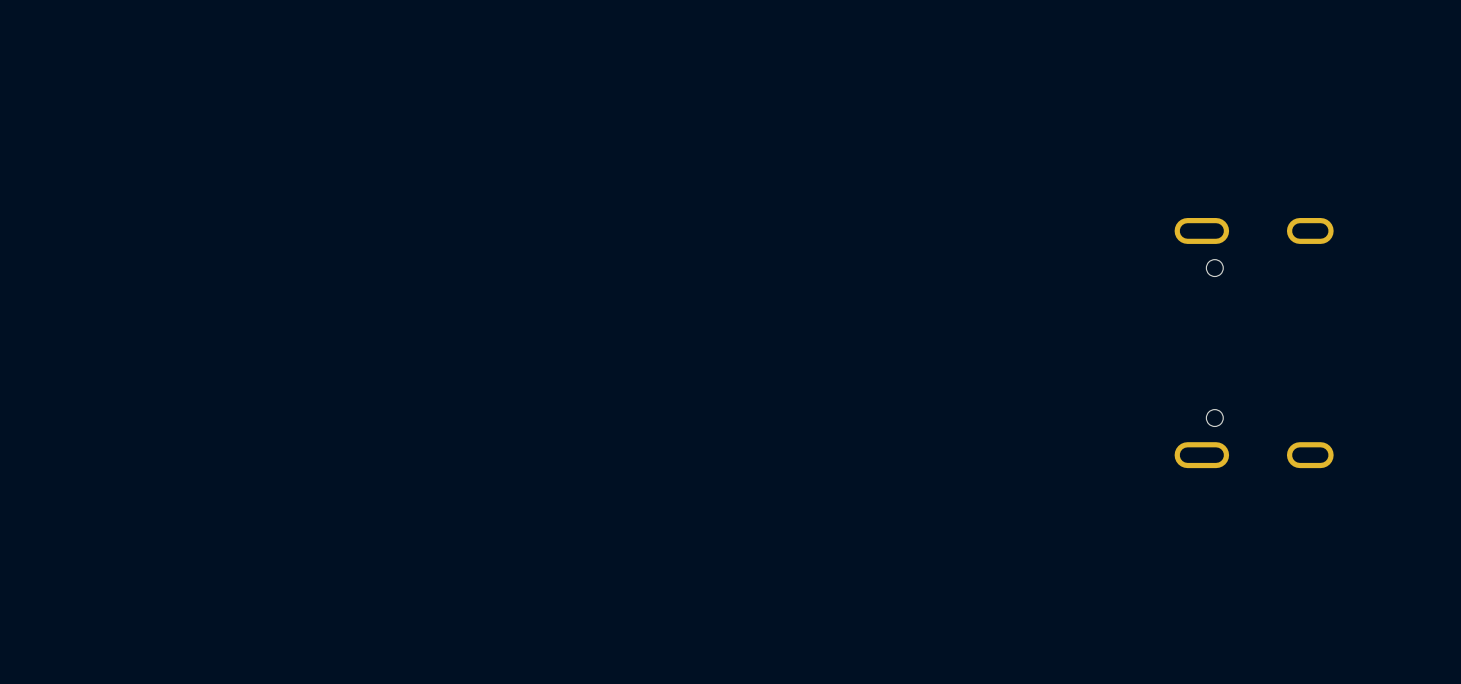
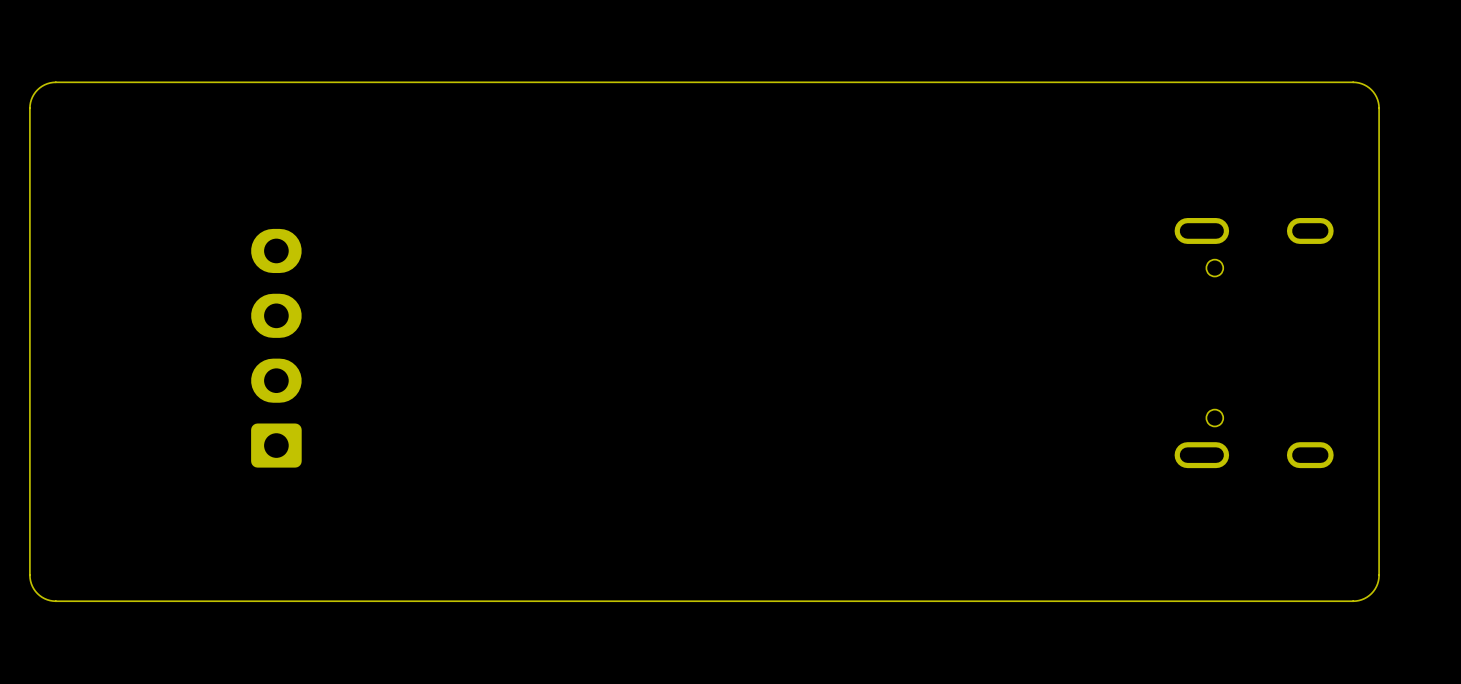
board edge: none -> (1353, 82) (47, 83) (33, 94) (29, 108) (31, 583) (39, 595) (55, 601) (1361, 599) (1375, 589) (1379, 575) (1379, 108) (1376, 97) (1371, 89) (1364, 84) (1353, 82)
part: none -> (276, 348)

